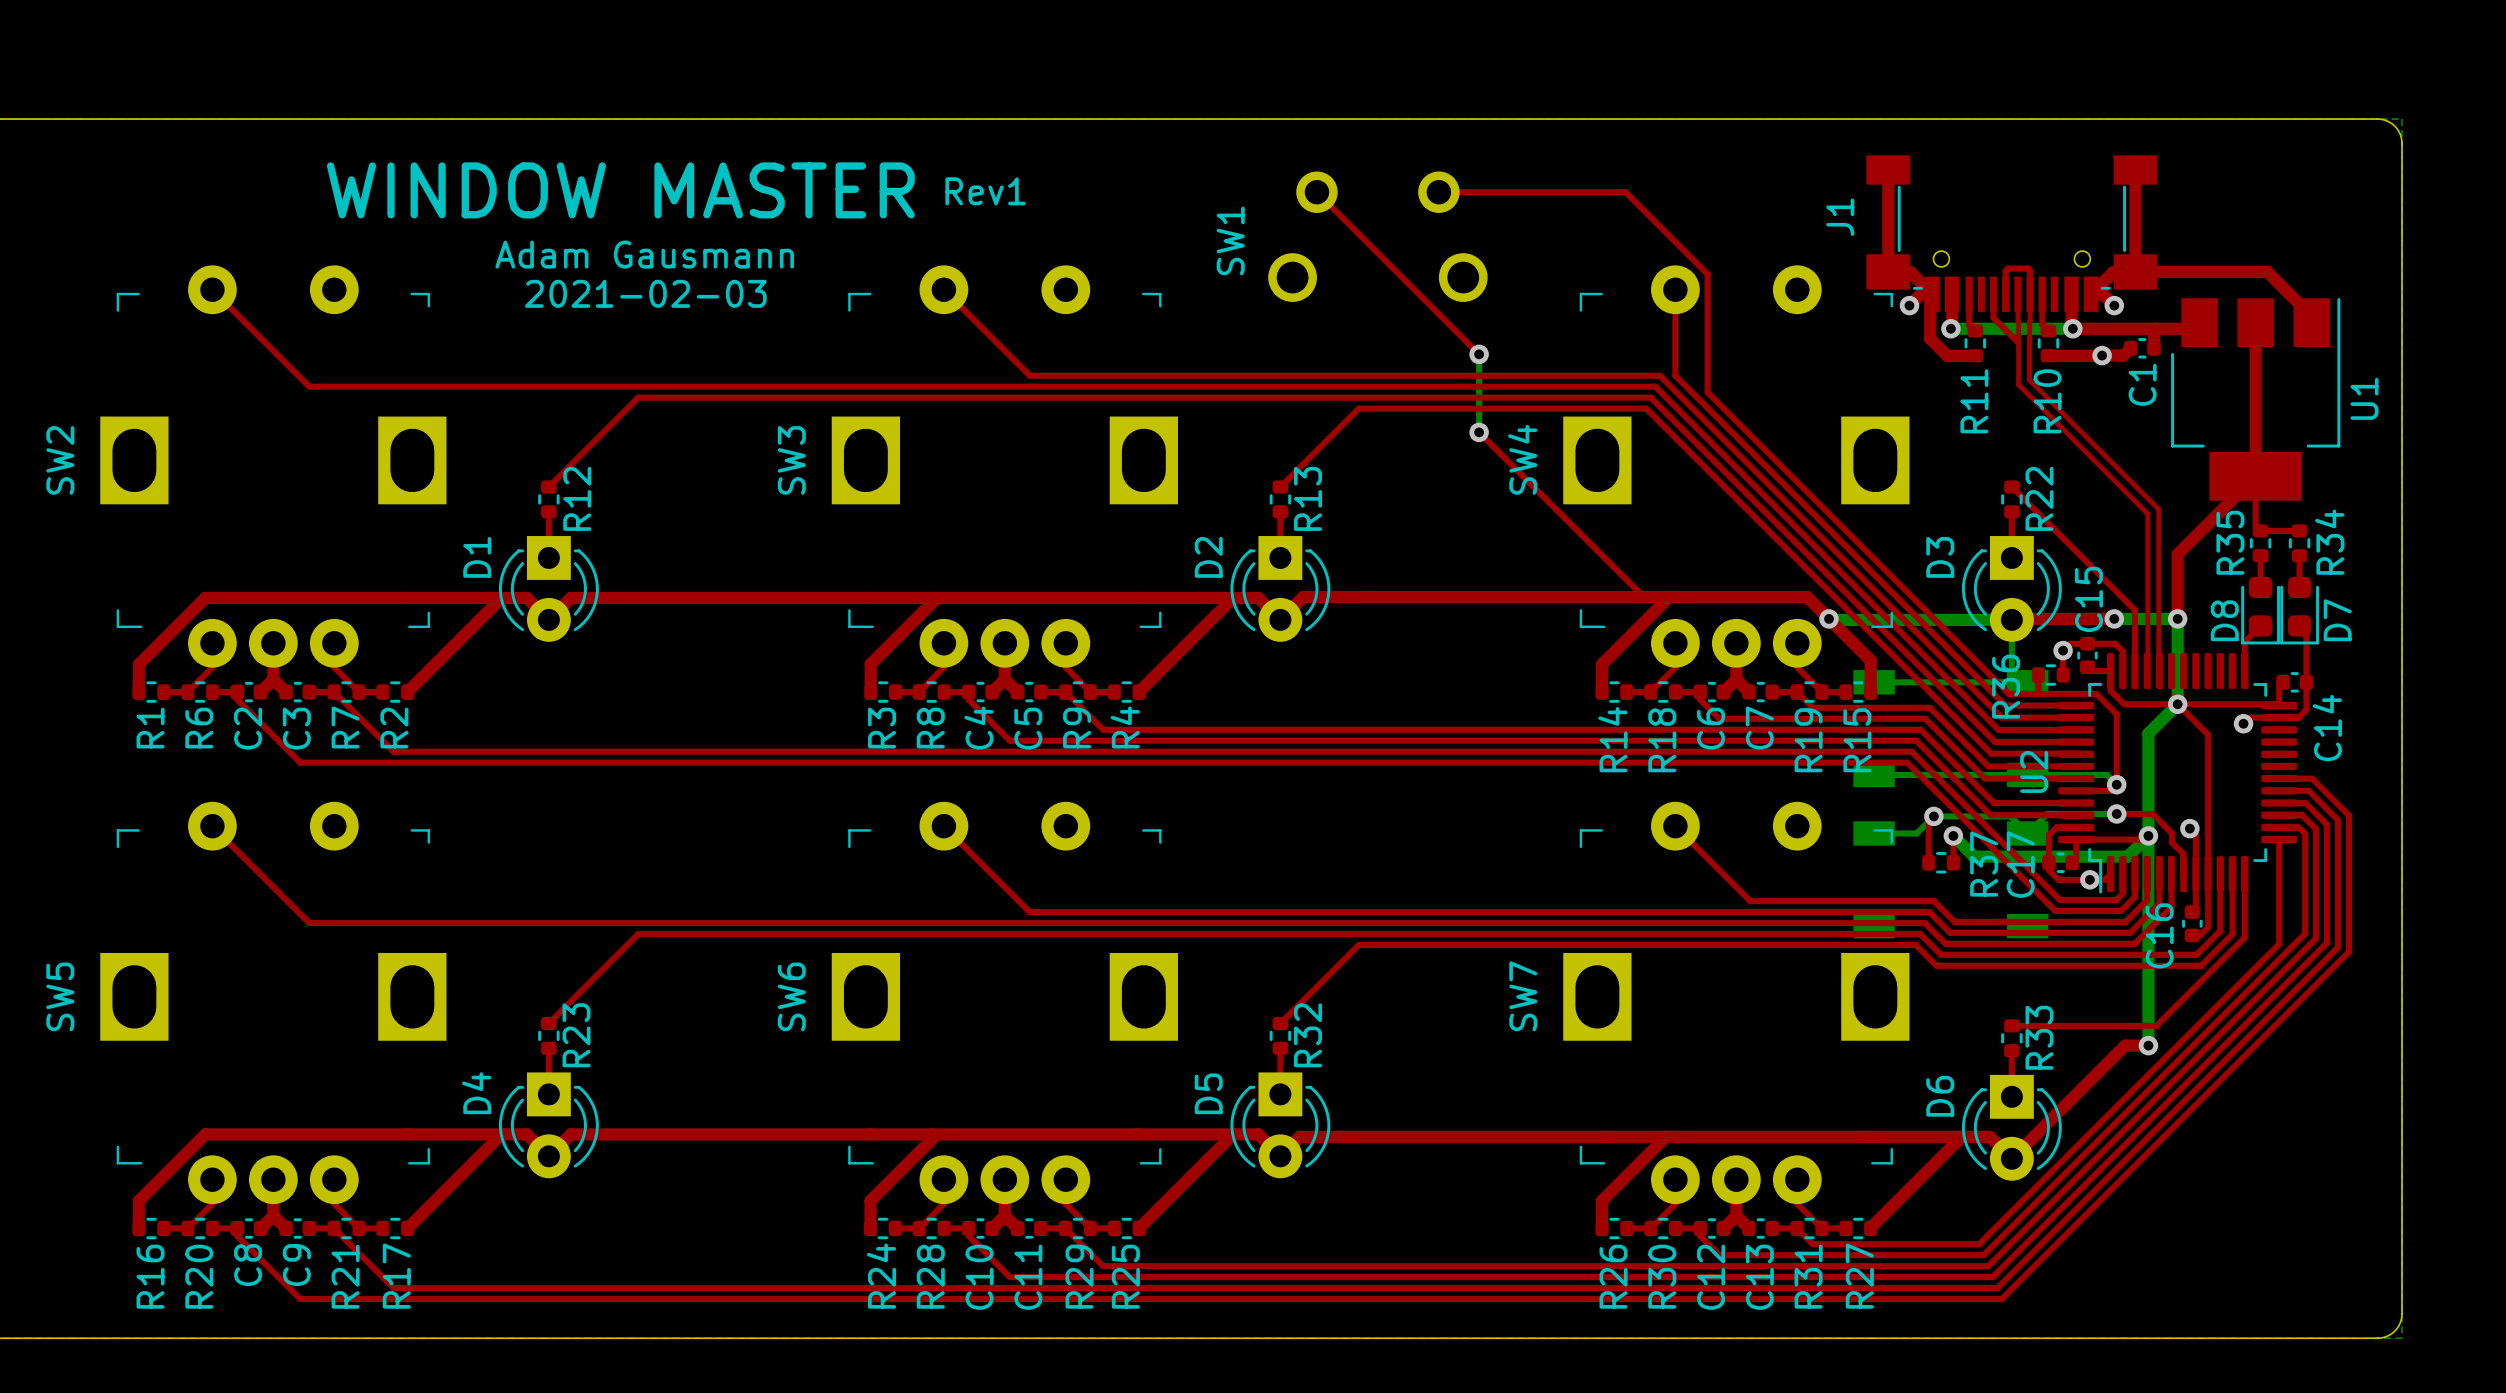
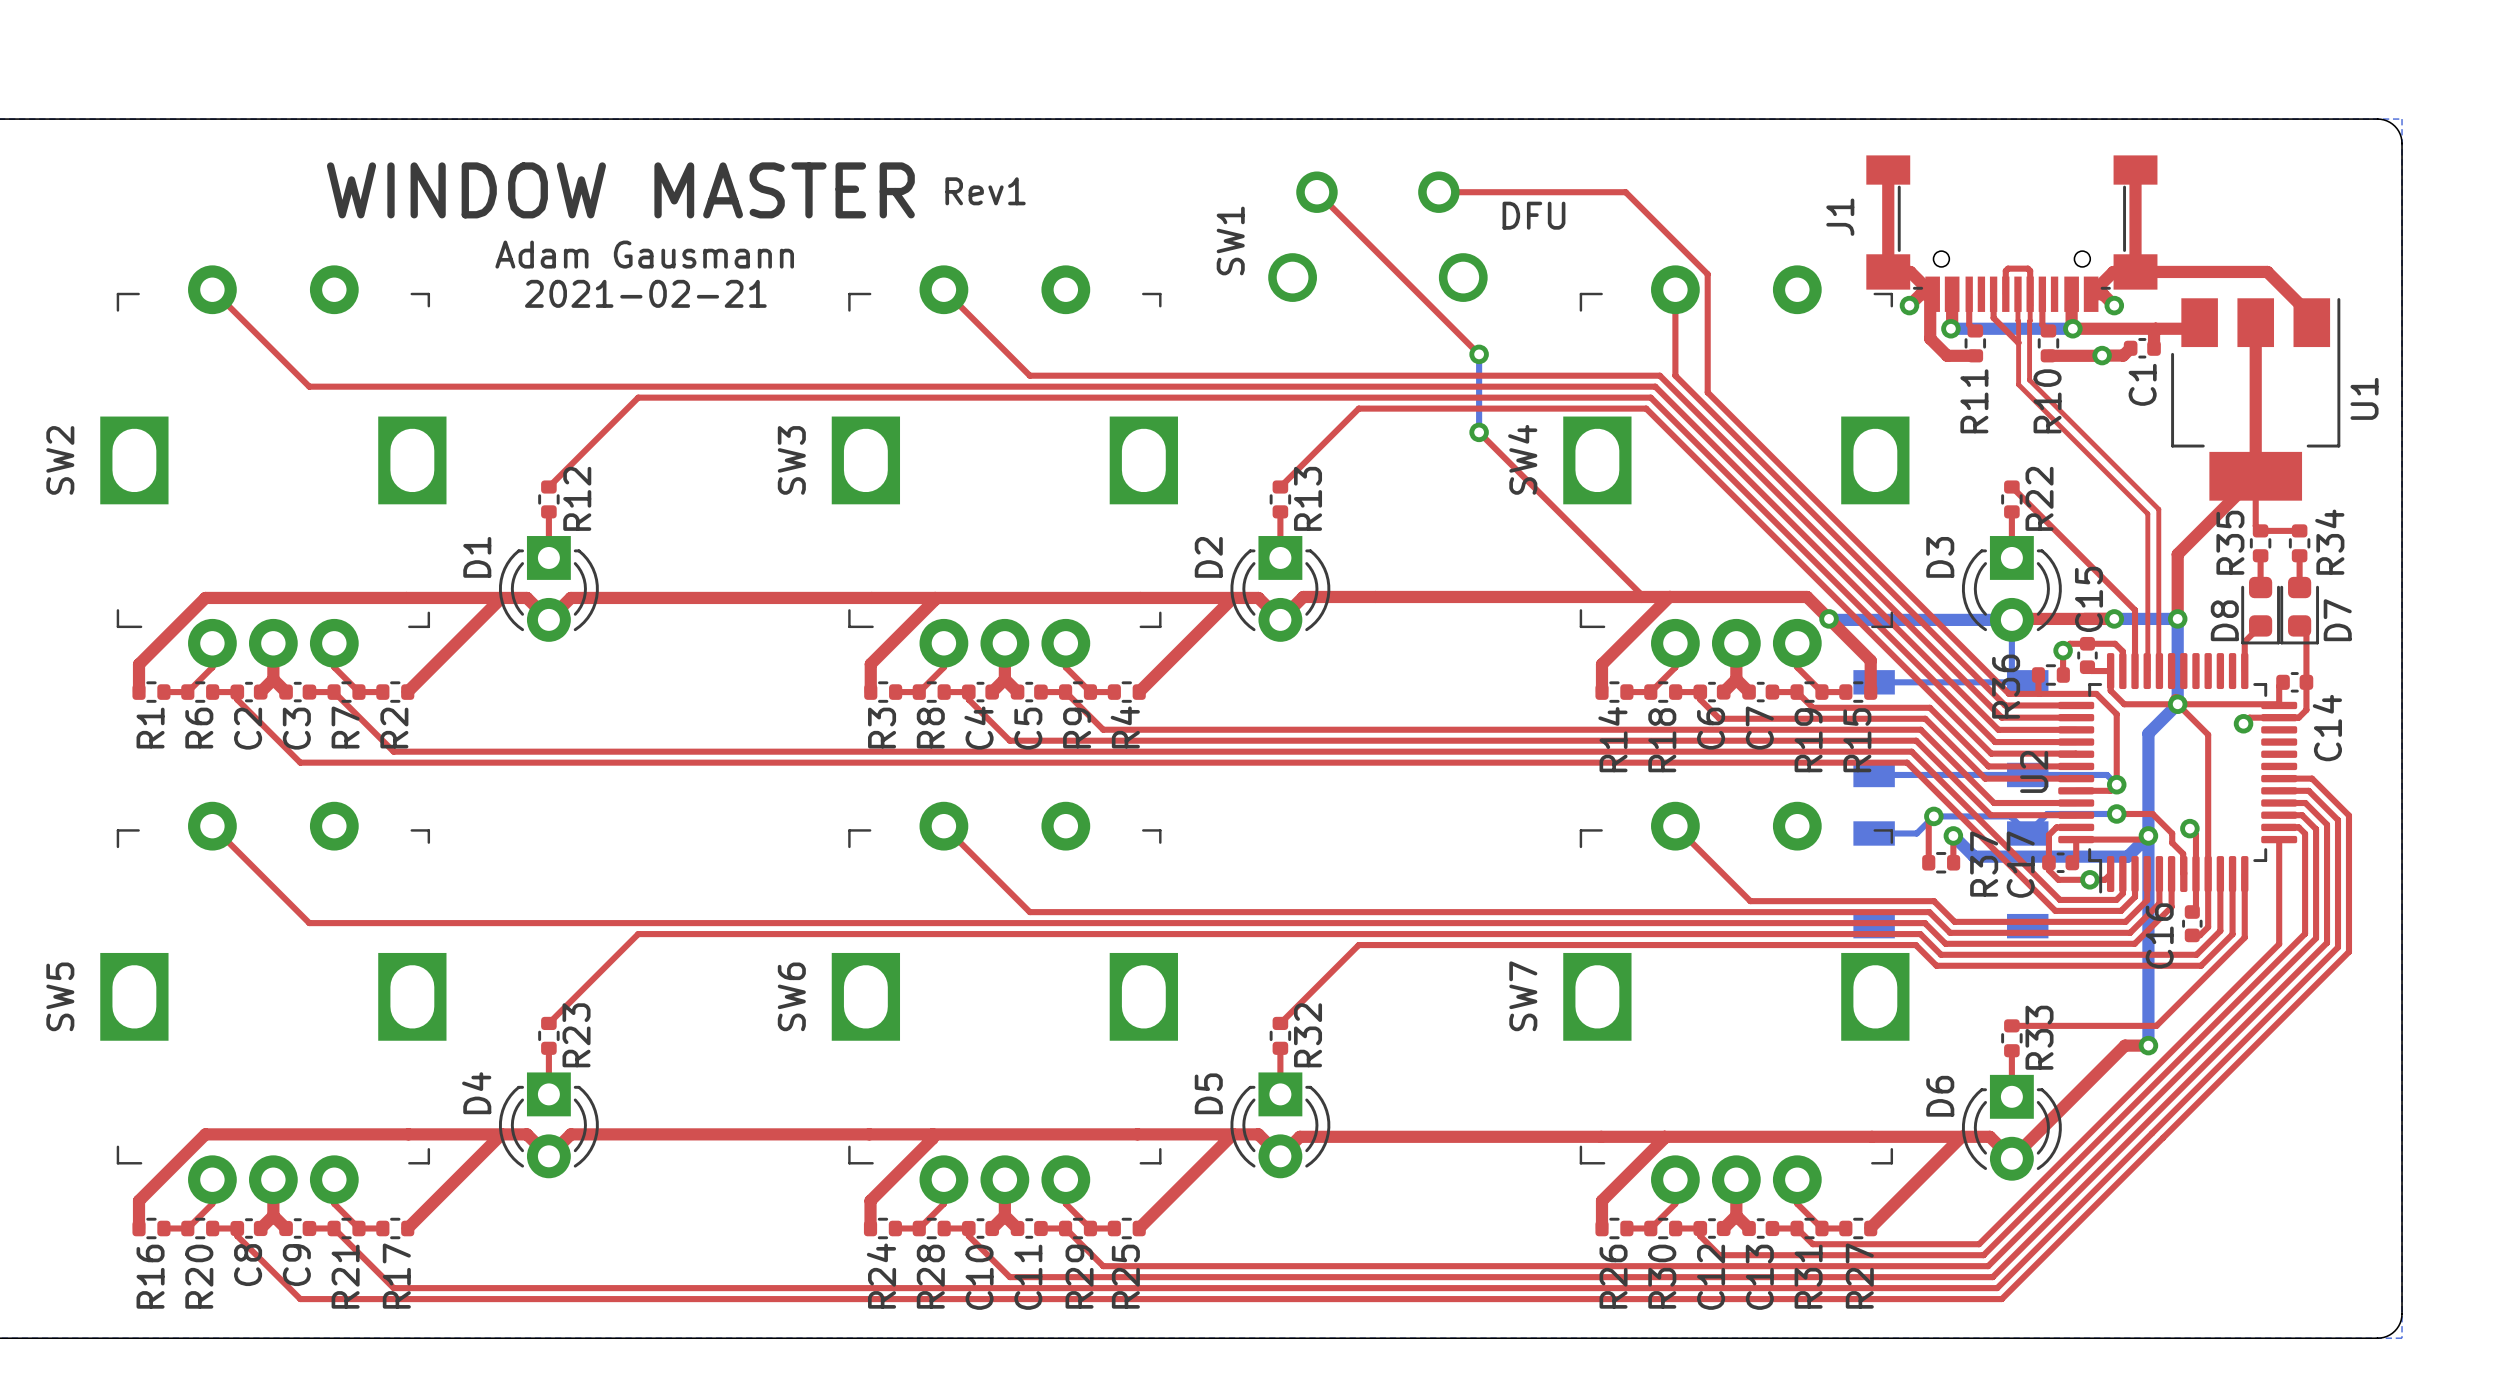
text: none -> DFU (1533, 215)
text: 2021-02-03 (645, 293) -> 2021-02-21 (645, 293)

